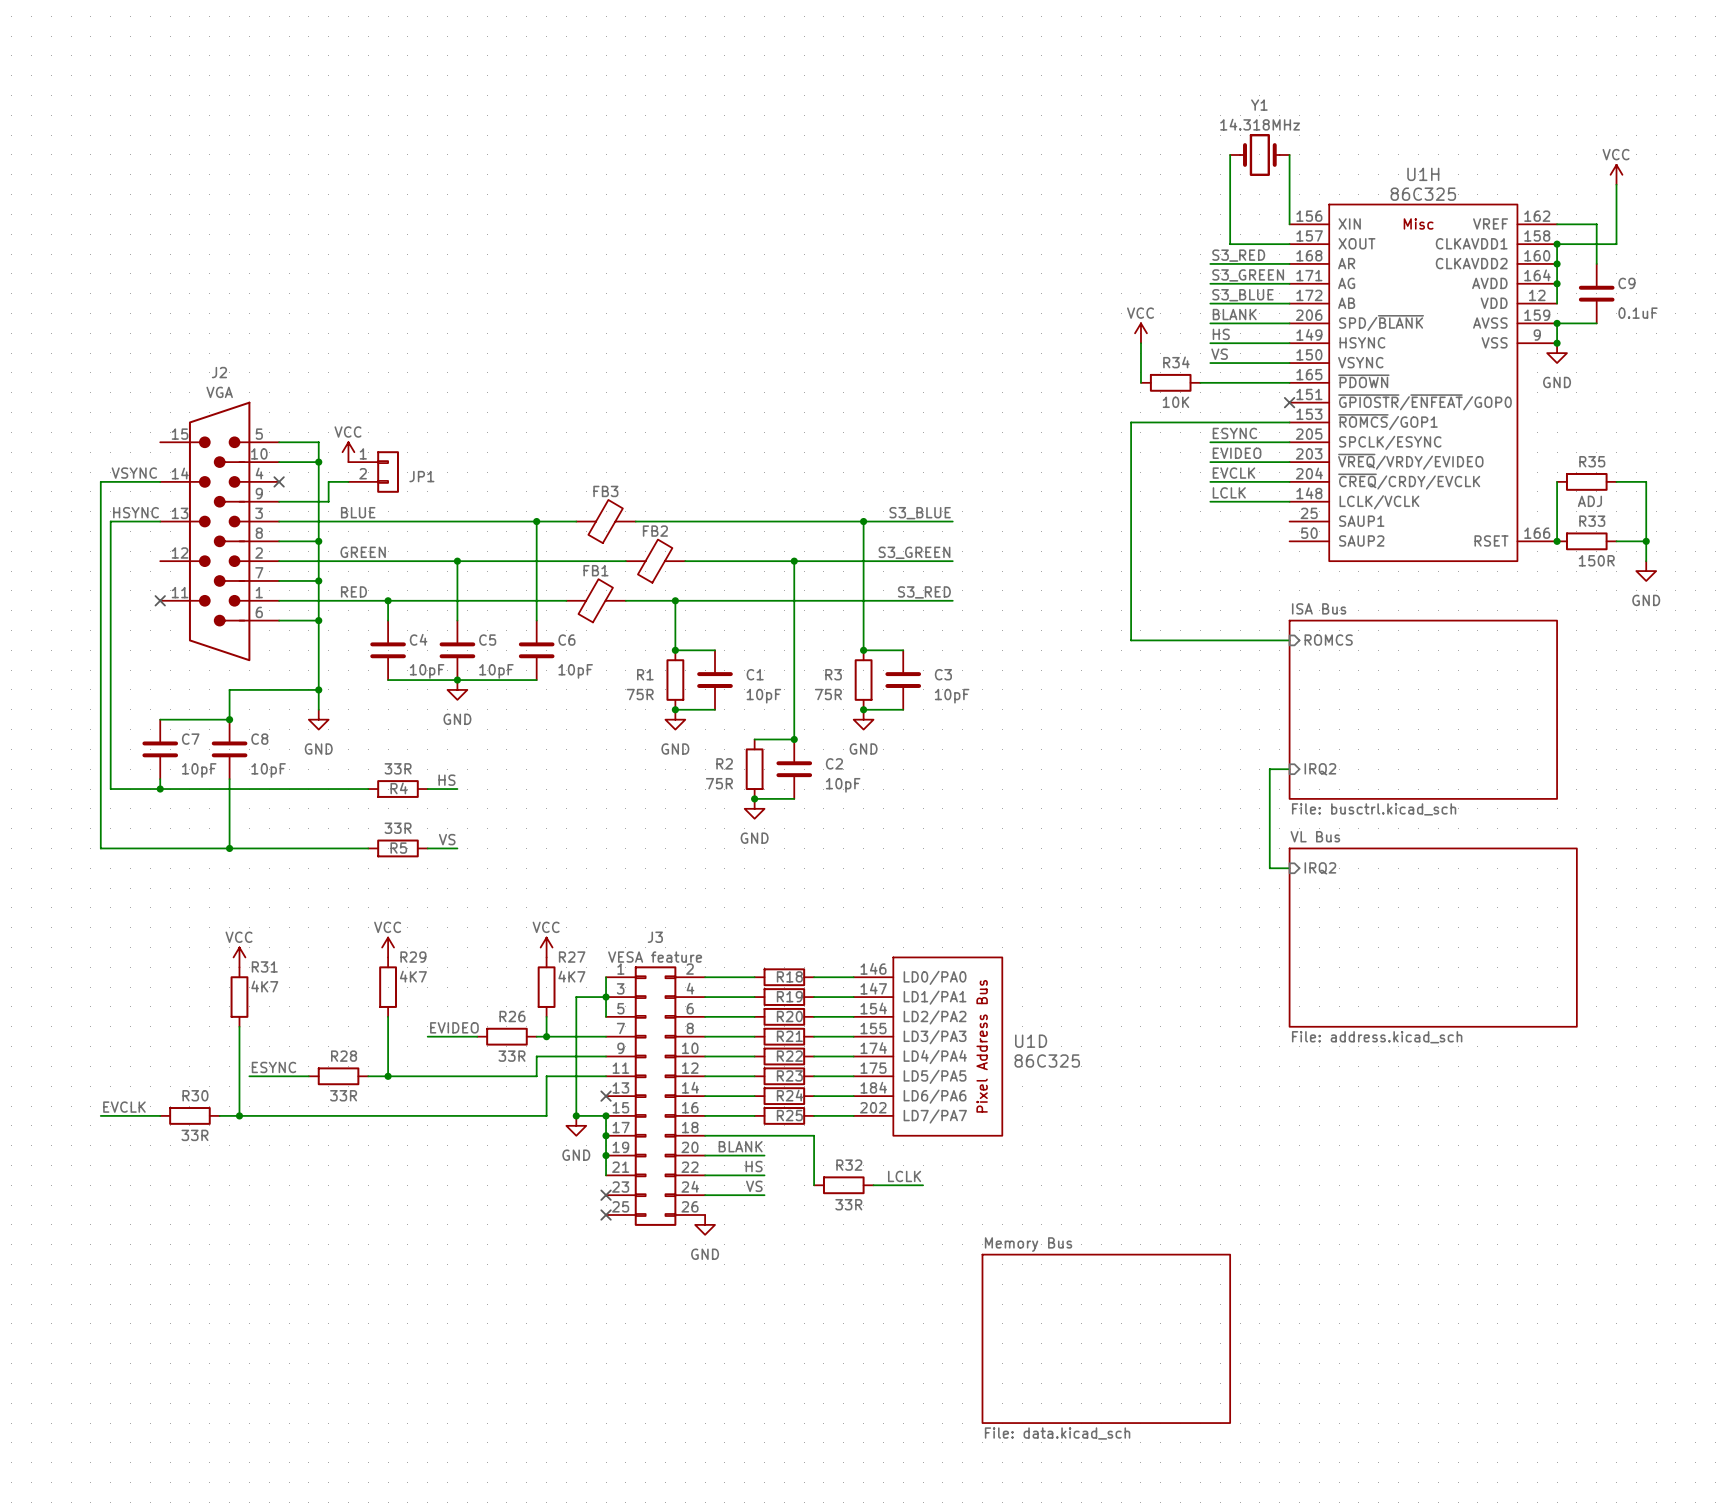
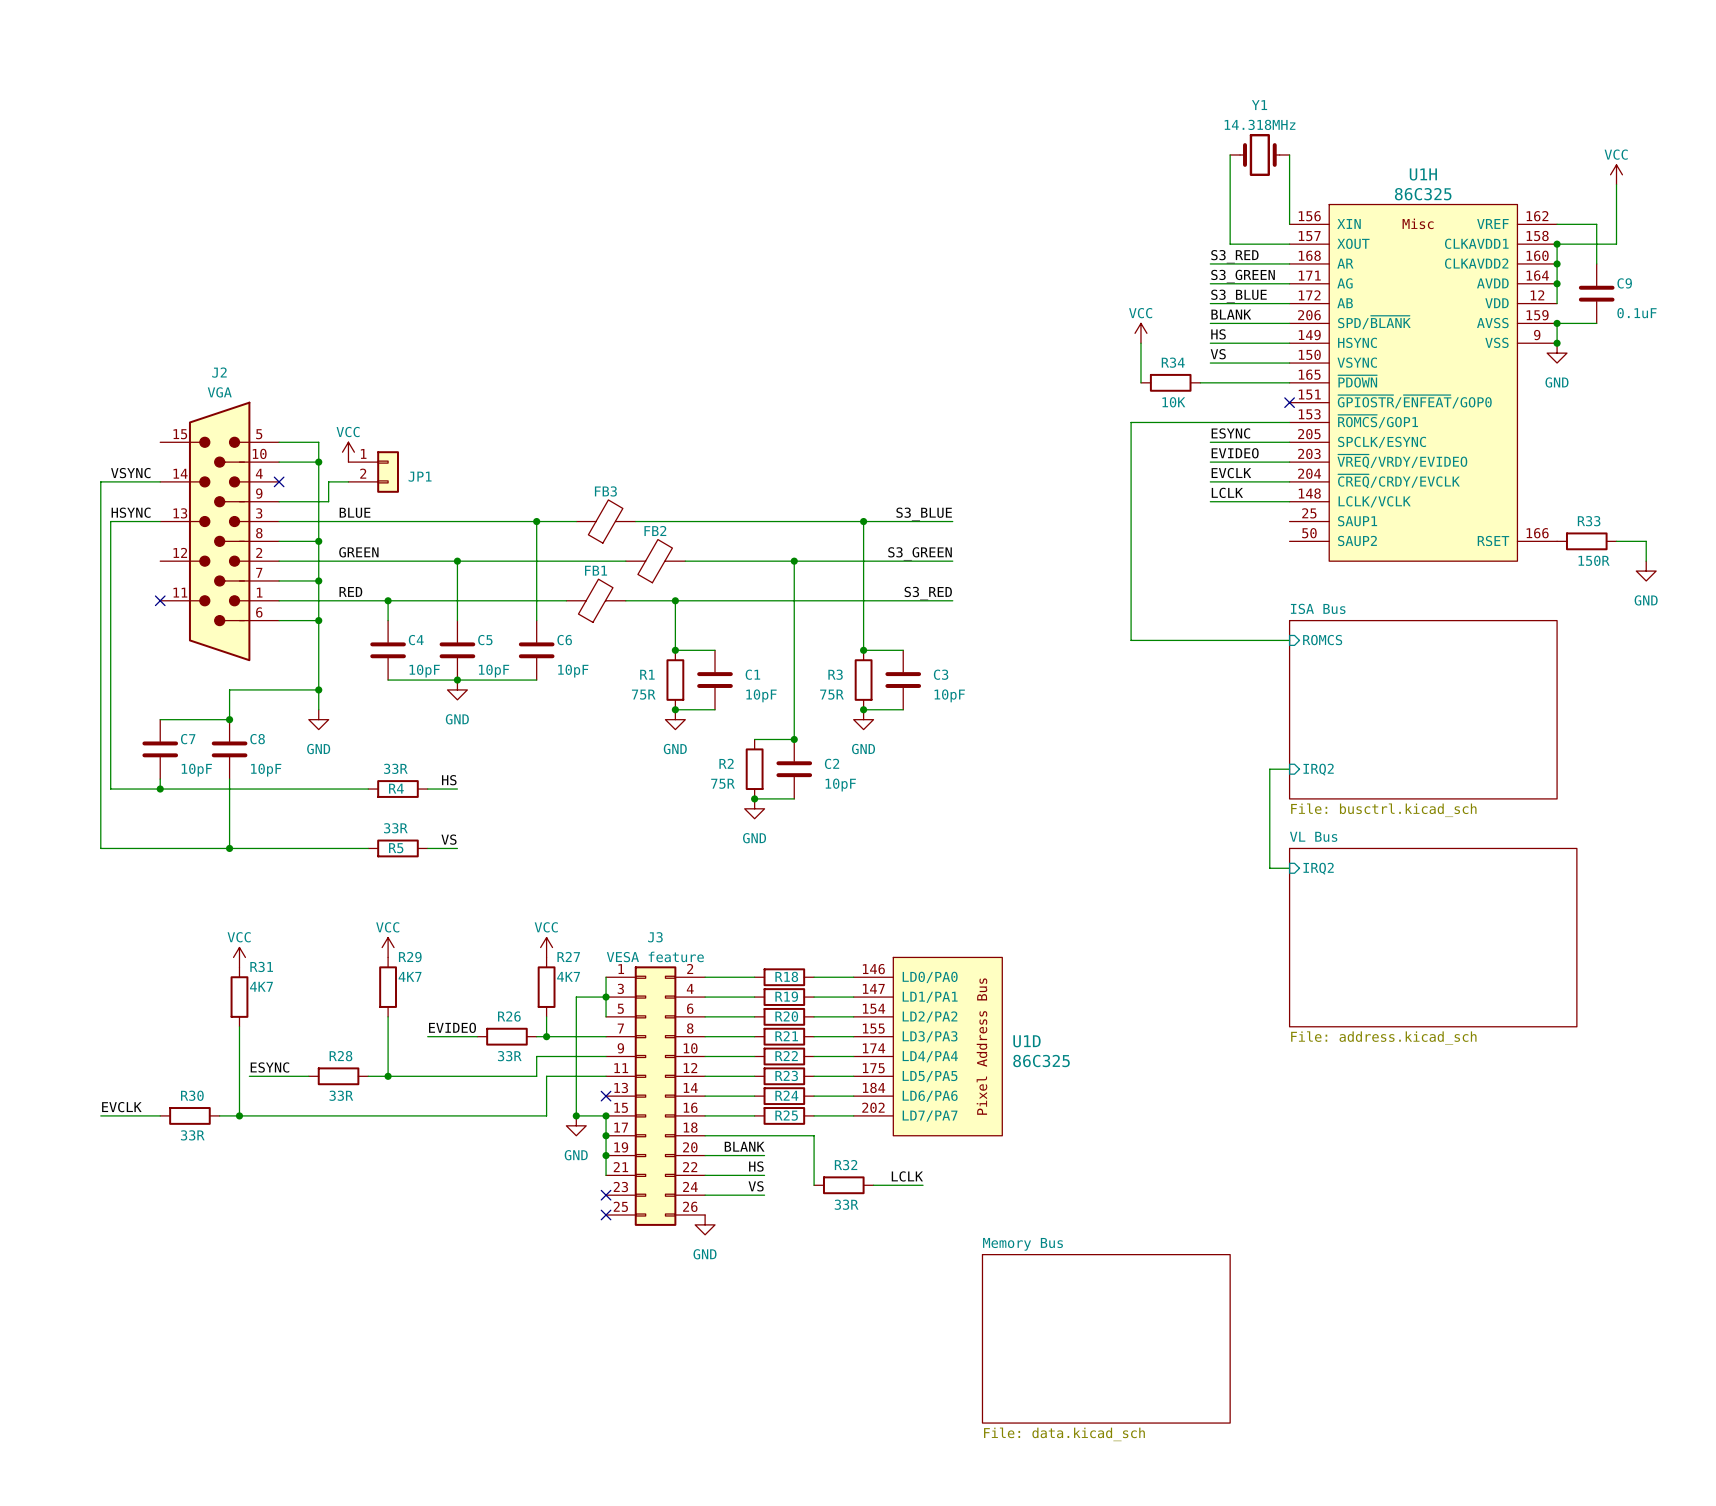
wire: (1557, 481) (1557, 541) -> none
R35: ADJ (1586, 481) -> none
wire: (1616, 481) (1646, 481) (1646, 541) -> none
junction: (1557, 541) -> none
junction: (1646, 541) -> none

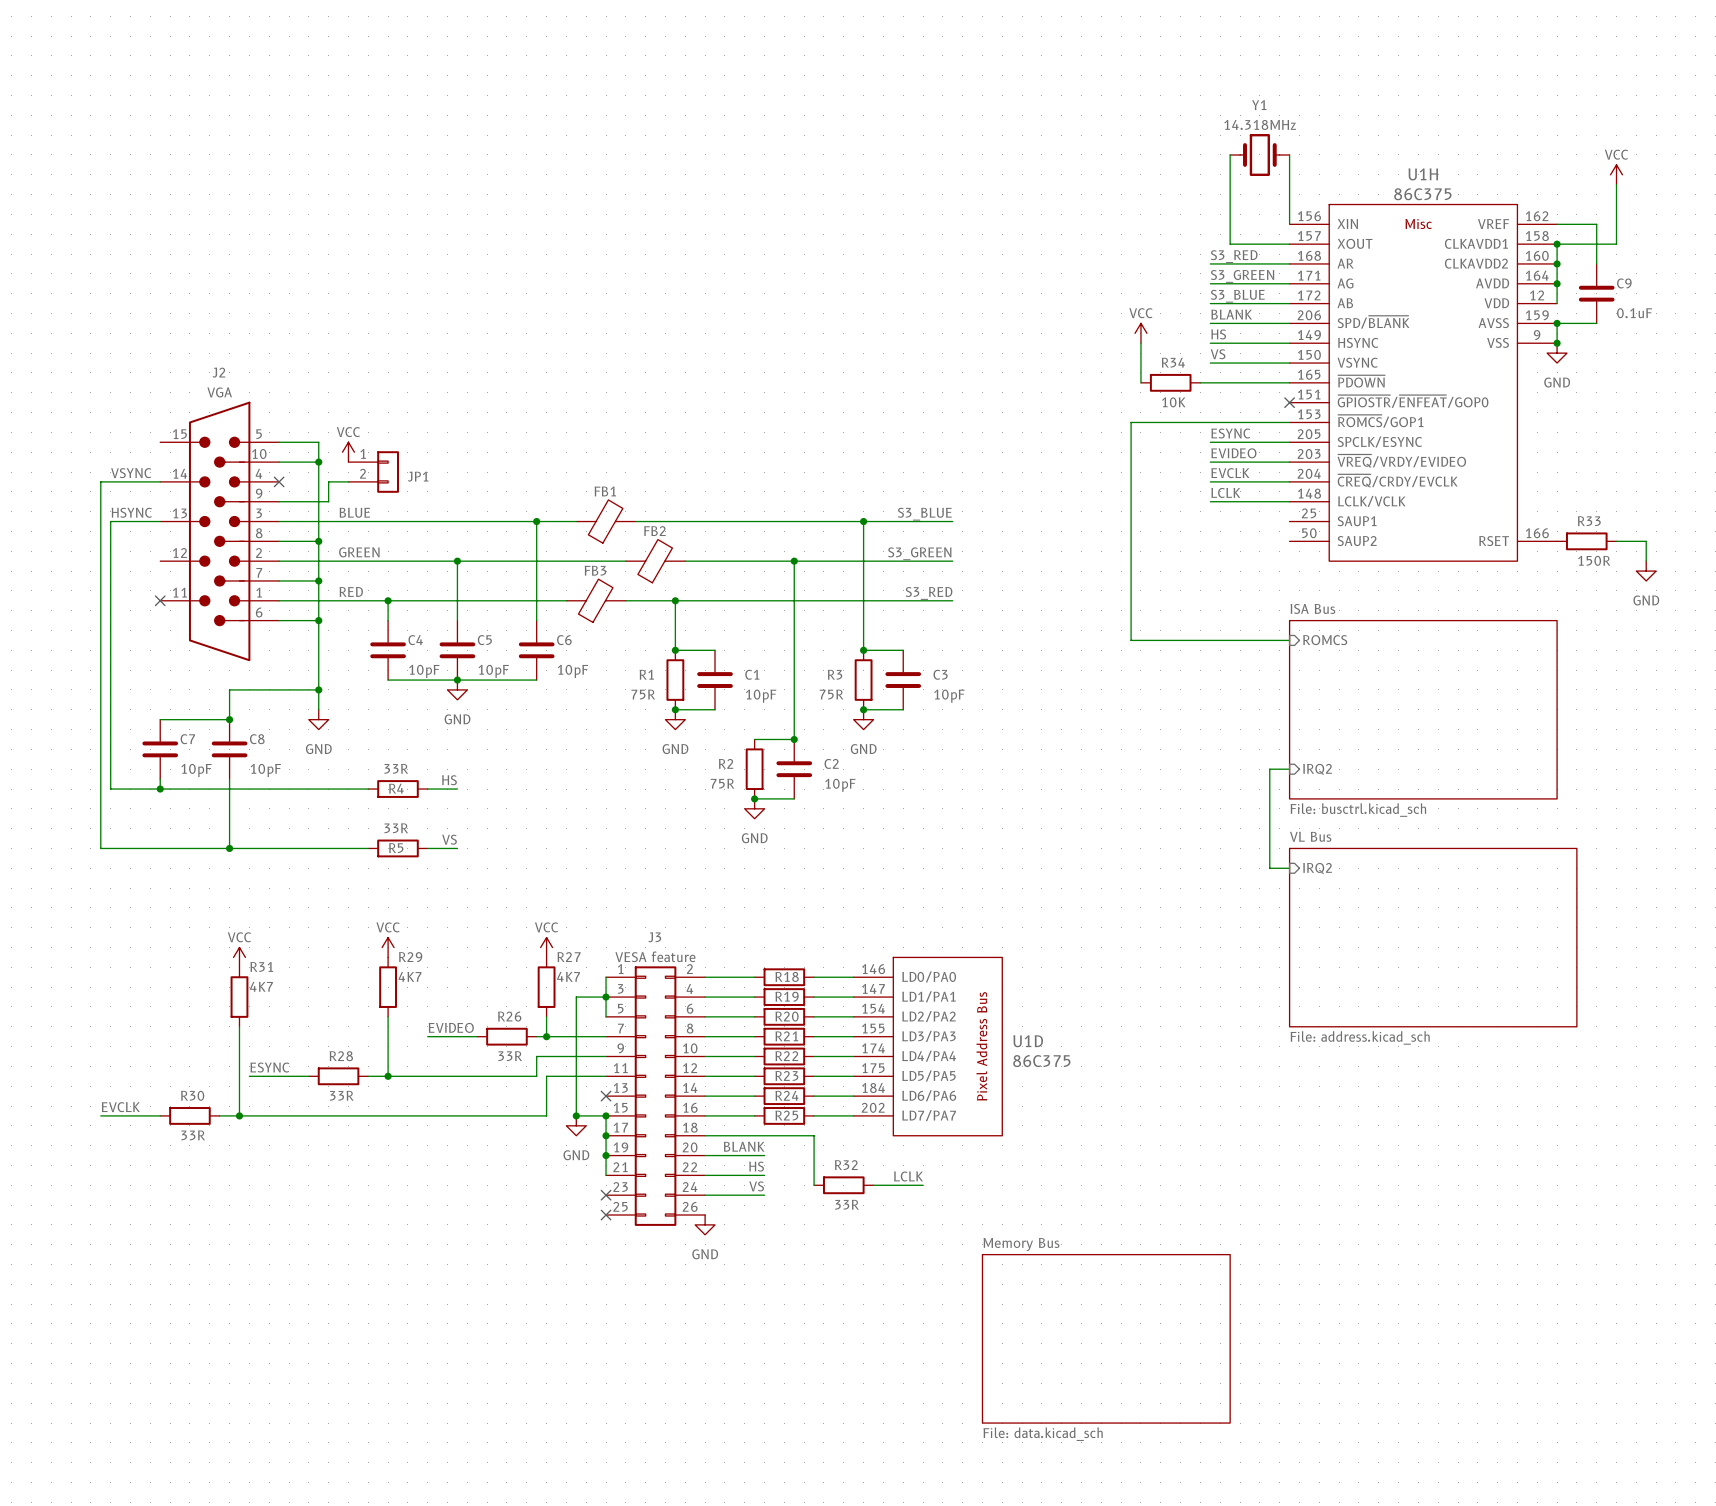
U1H value: 86C325 (1423, 194) -> 86C375 (1422, 194)
FB3 name: FB3 (605, 491) -> FB1 (605, 491)
FB1 name: FB1 (596, 570) -> FB3 (595, 570)
U1D value: 86C325 (1041, 1061) -> 86C375 (1041, 1061)

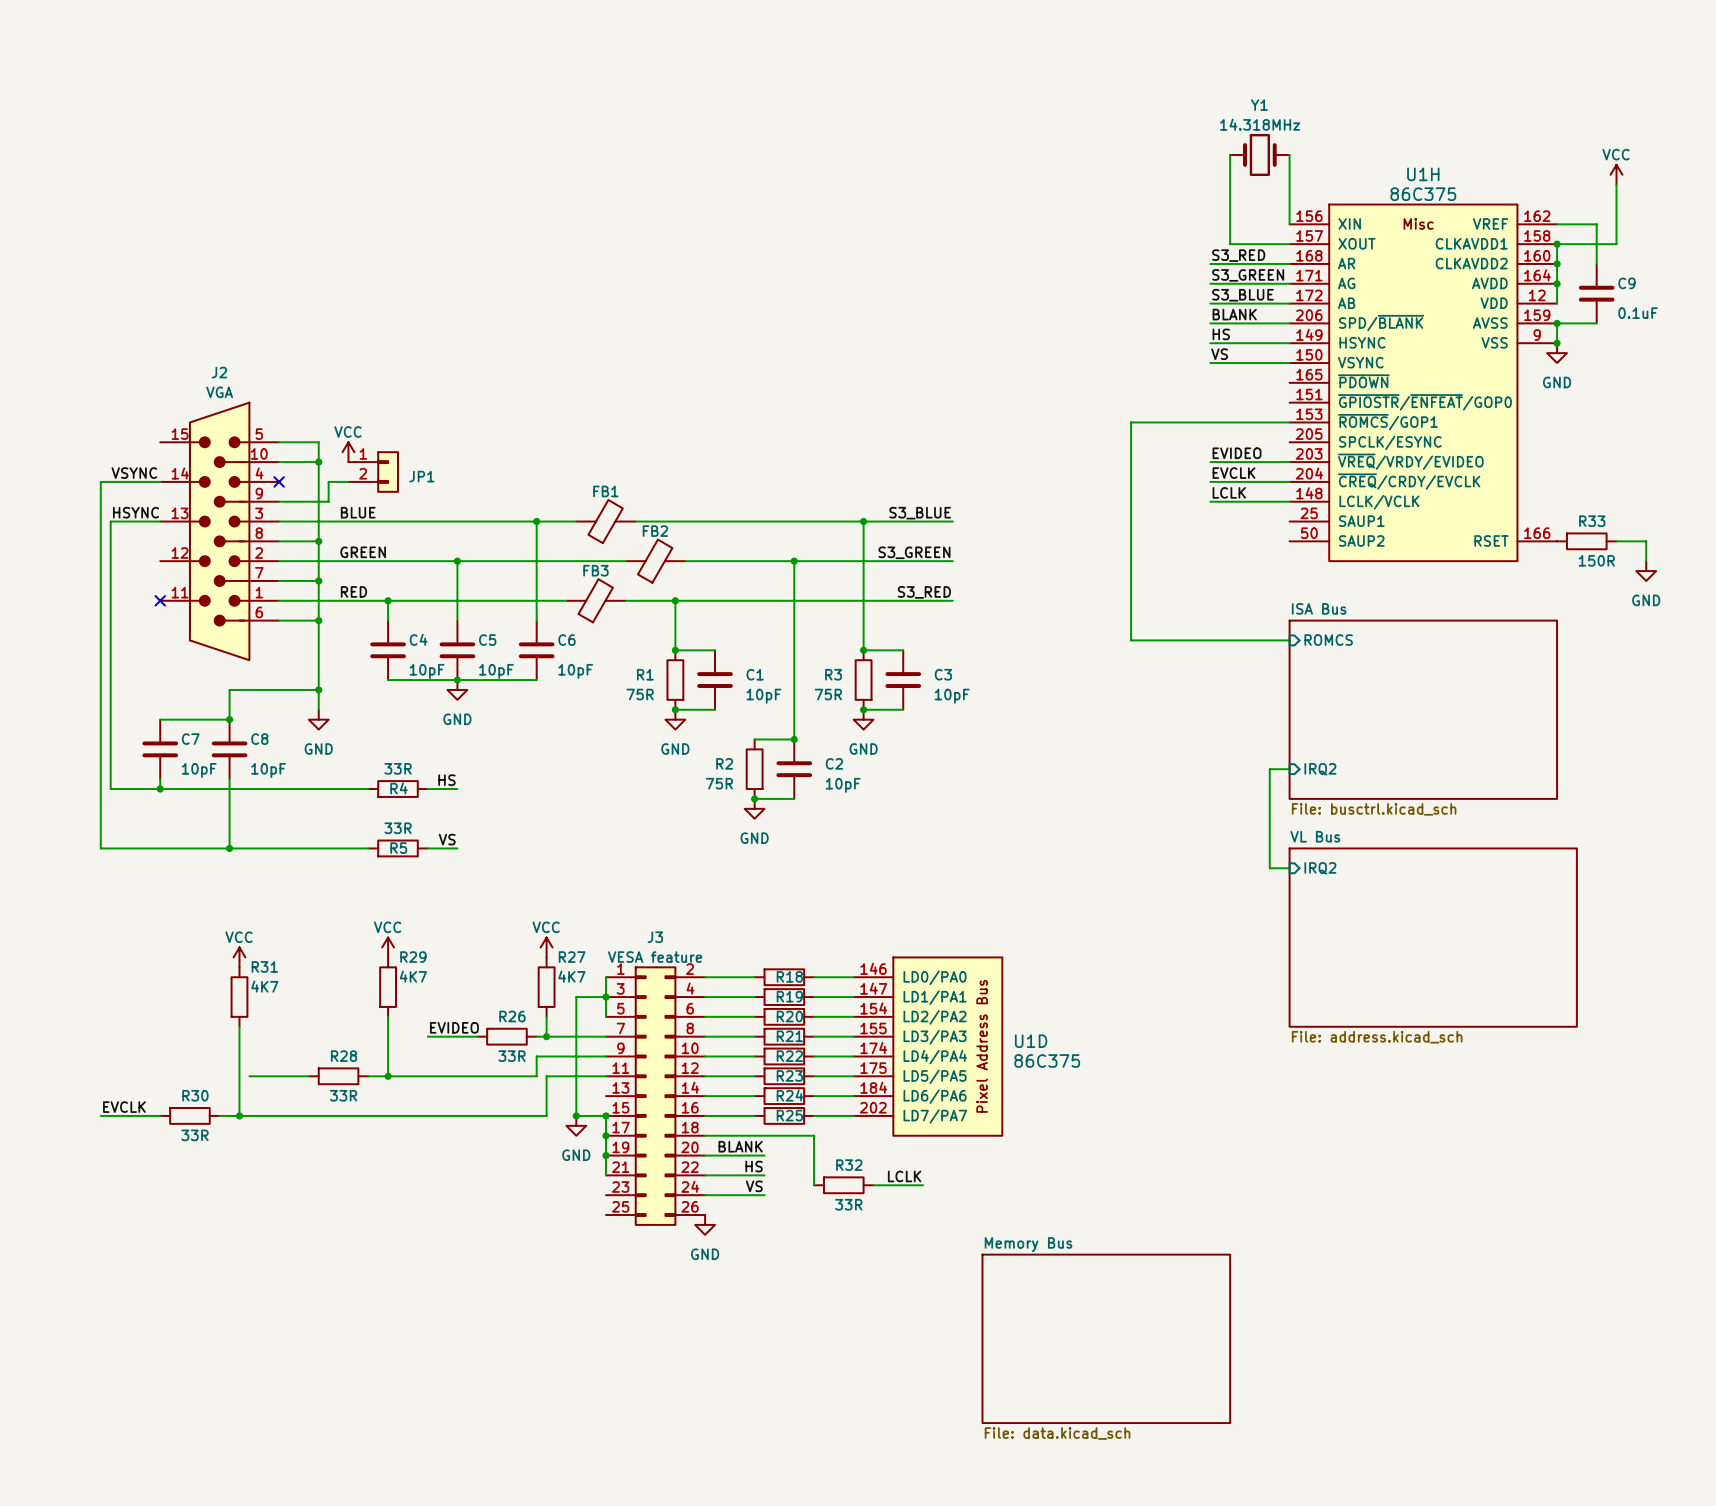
power symbol: VCC (1140, 333) -> none
wire: (1140, 343) (1140, 382) -> none
R34: 10K (1170, 382) -> none
wire: (1200, 382) (1289, 382) -> none
no-connect mark: (1289, 402) -> none
label: ESYNC (1230, 433) -> none
wire: (1210, 442) (1289, 442) -> none
label: ESYNC (269, 1067) -> none
no-connect mark: (606, 1096) -> none
no-connect mark: (606, 1195) -> none
no-connect mark: (606, 1215) -> none

